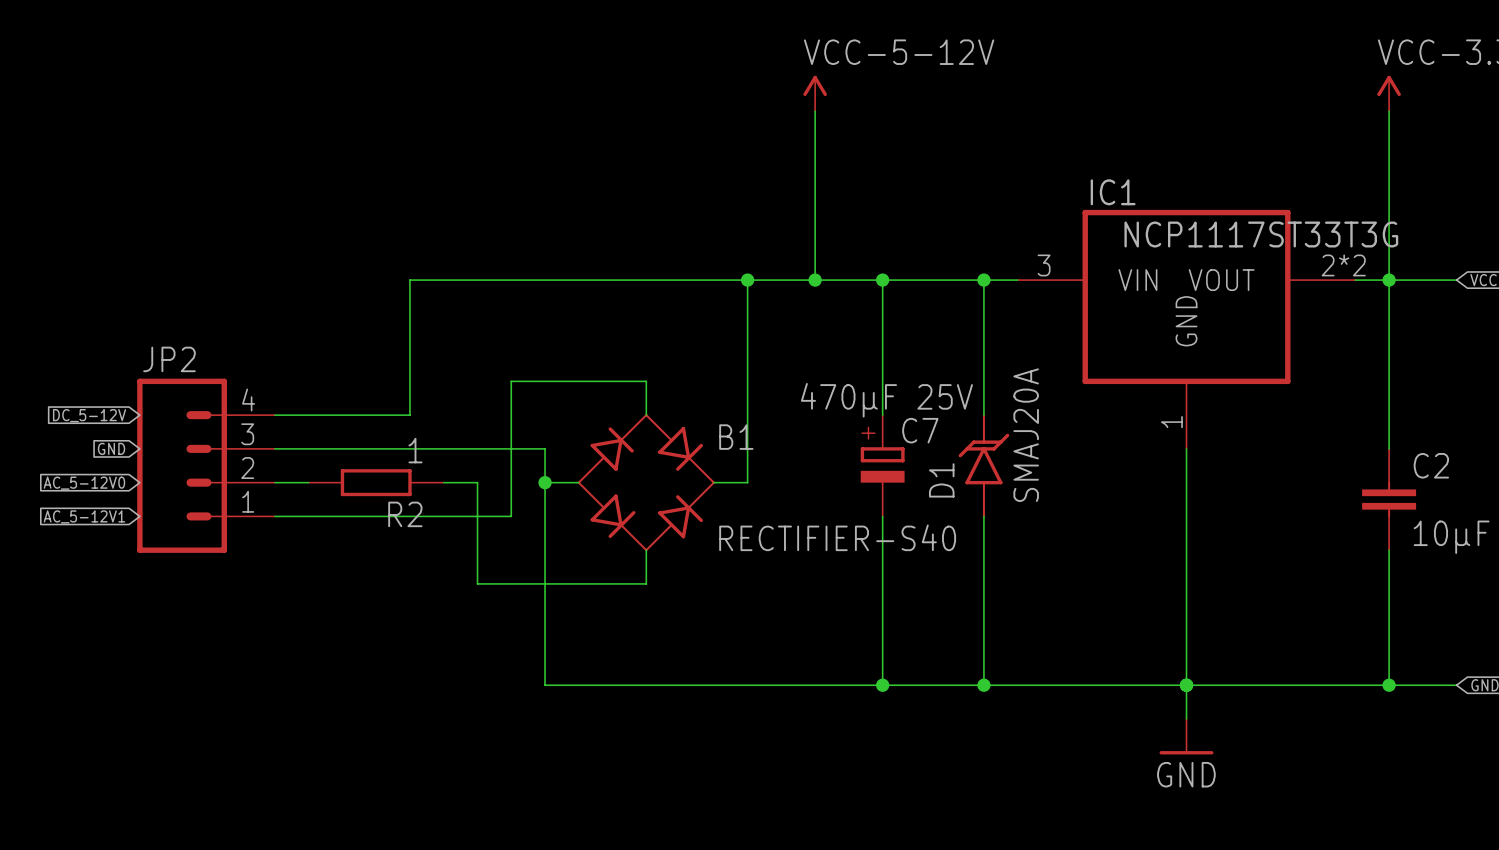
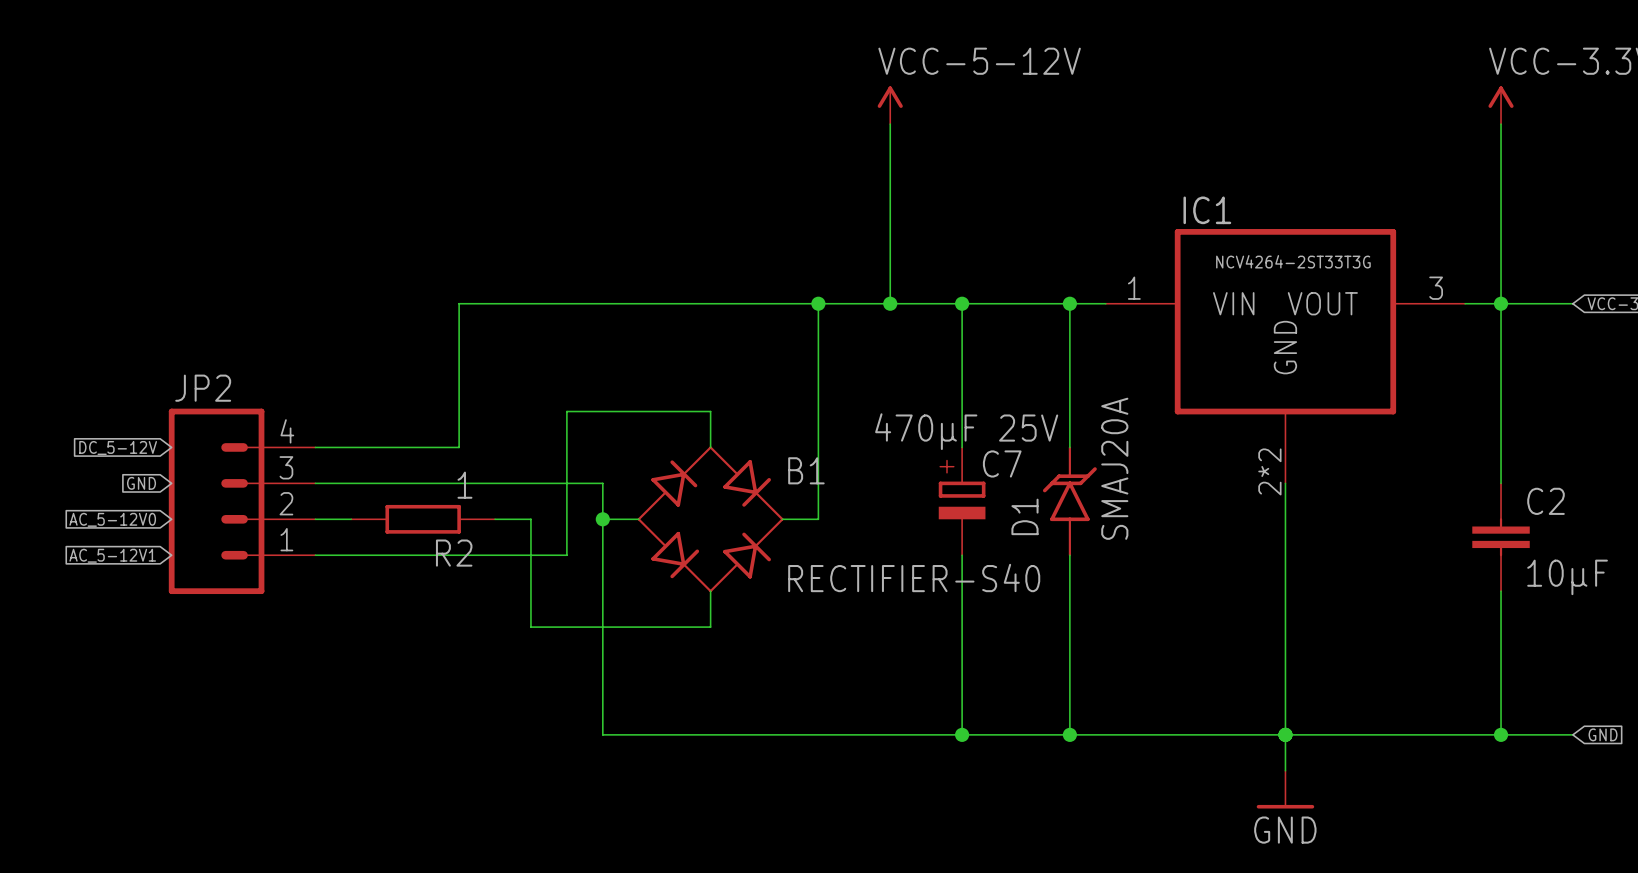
IC1 value: NCP1117ST33T3G (1261, 234) -> NCV4264-2ST33T3G (1293, 261)
IC1 pin number: 3 (1044, 265) -> 1 (1134, 288)
IC1 pin number: 2*2 (1343, 265) -> 3 (1436, 288)
IC1 pin number: 1 (1171, 422) -> 2*2 (1269, 471)

